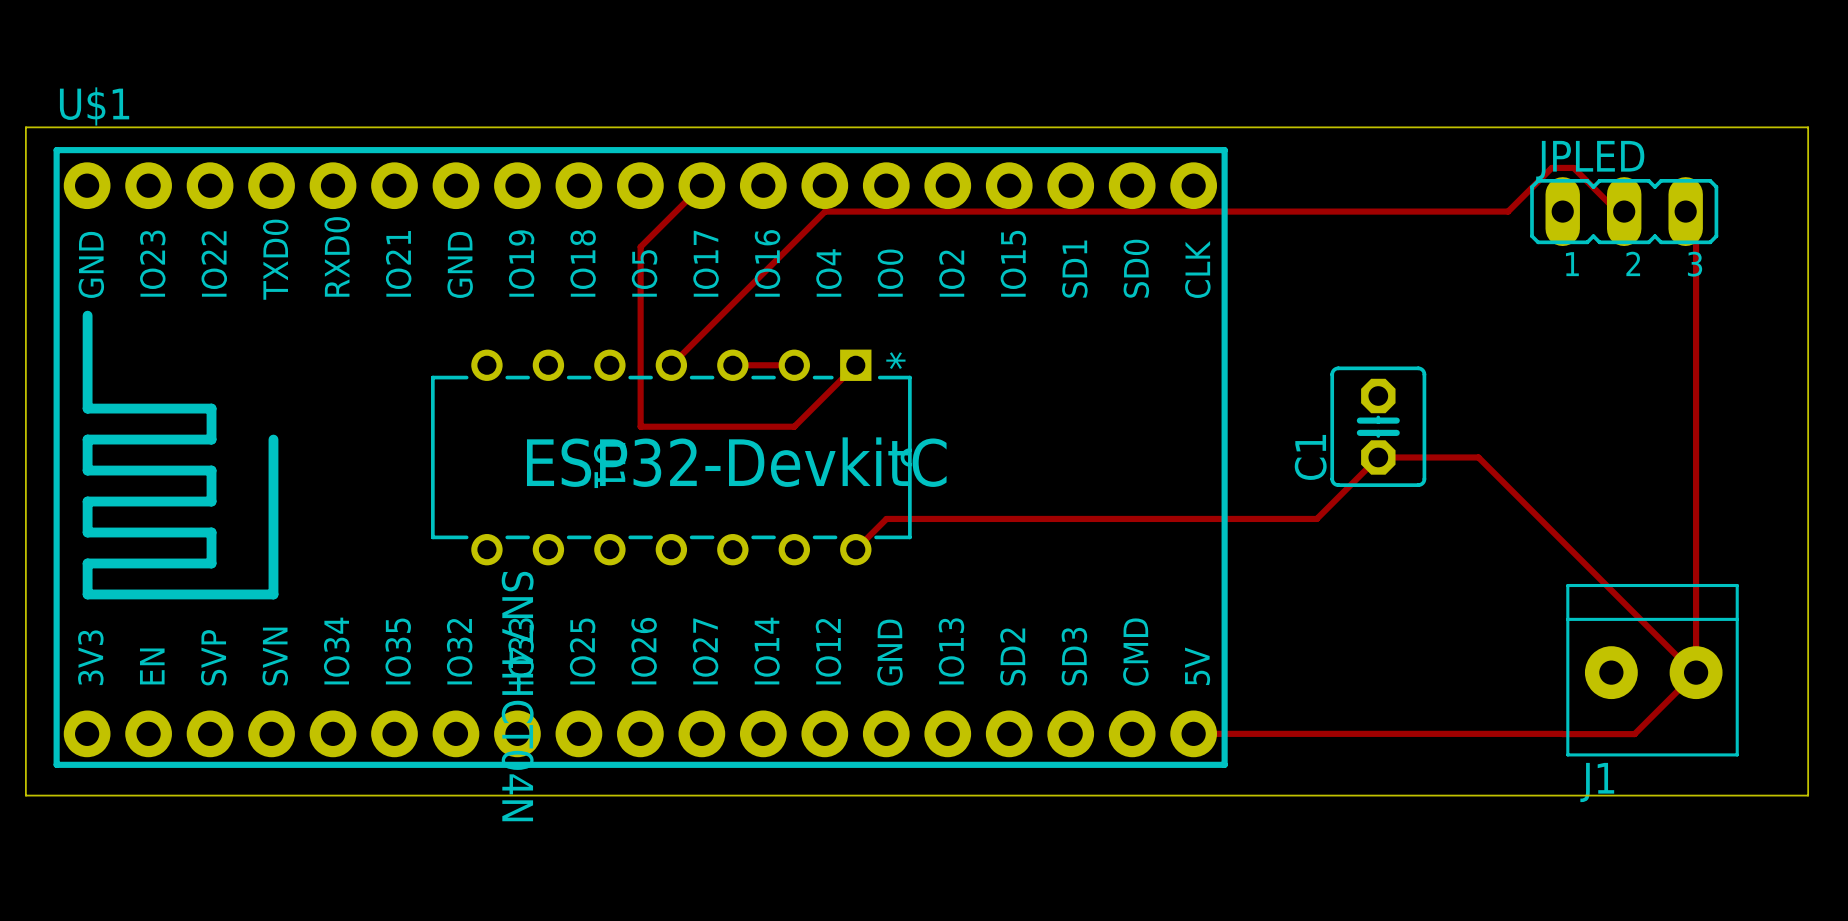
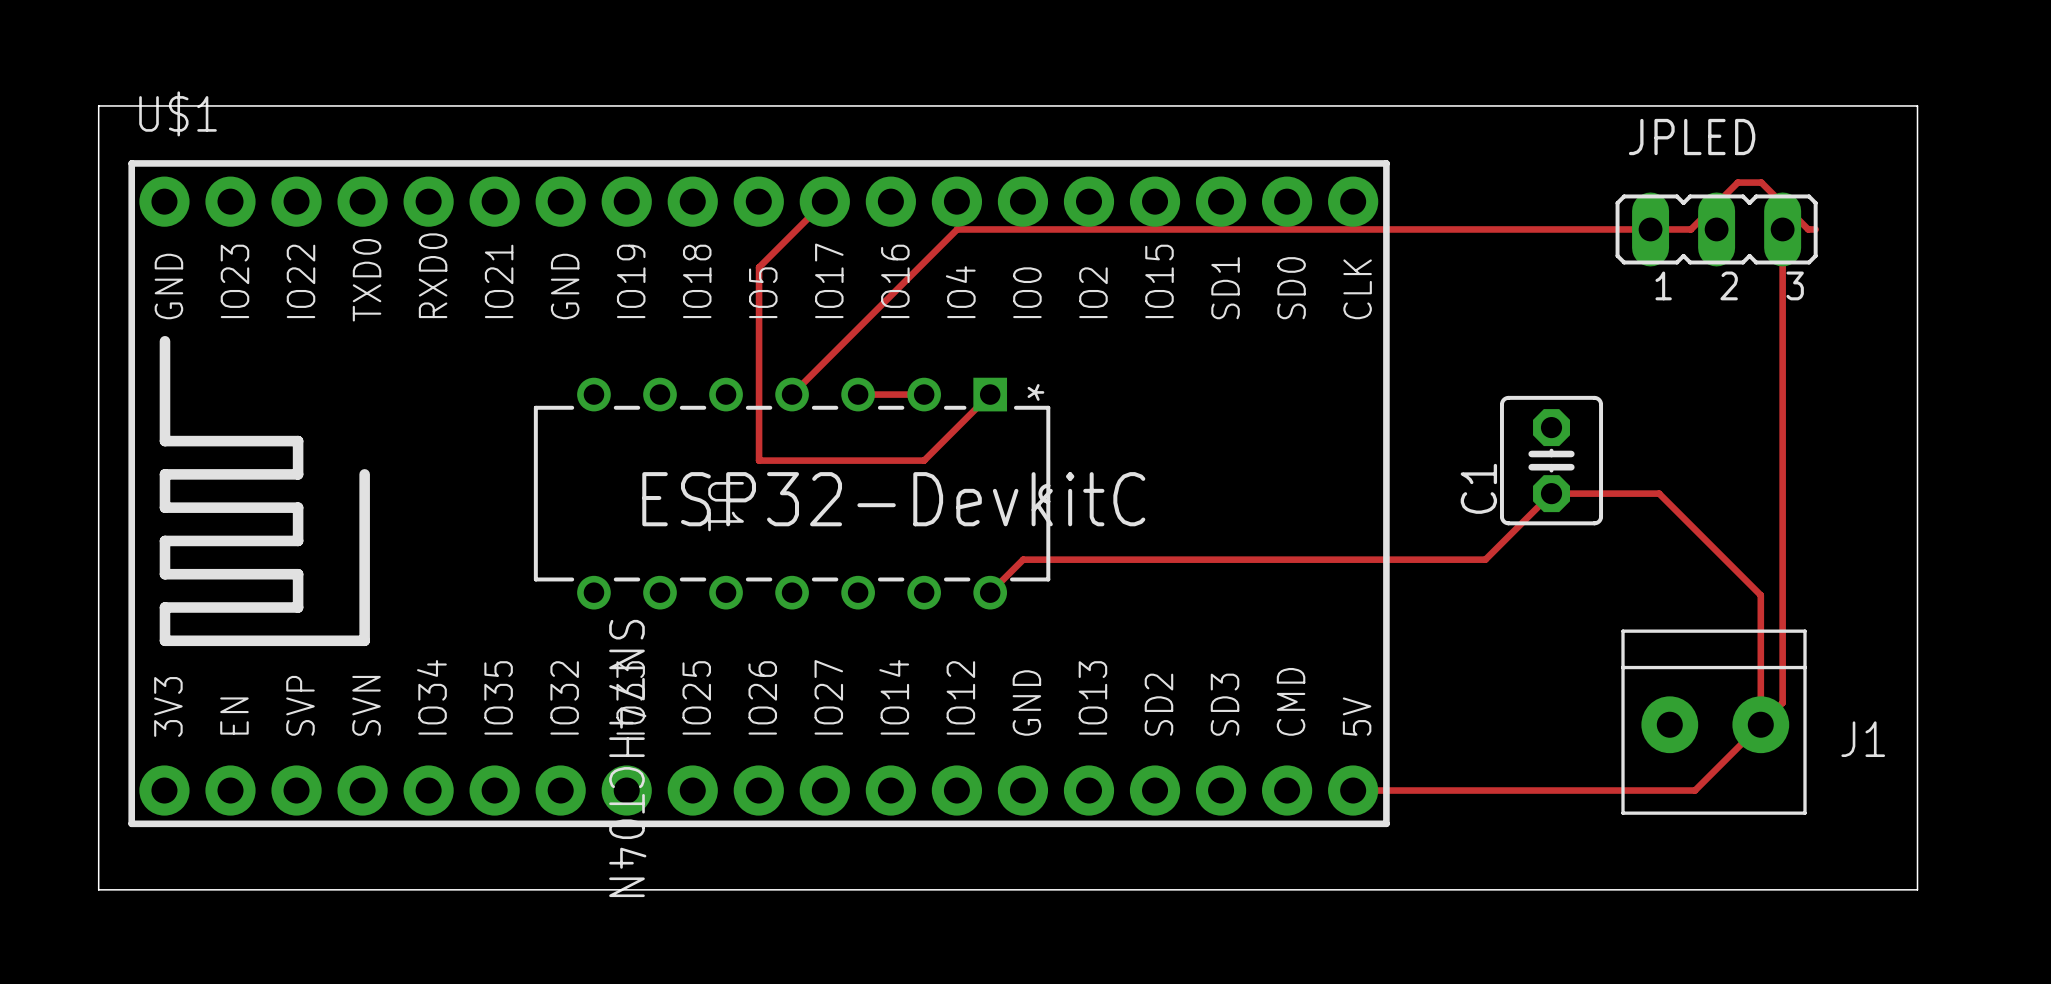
board edge: (25, 127) (1808, 127) (1808, 795) (25, 795) -> (98, 138) (98, 105) (1917, 105) (1917, 889) (98, 889) (98, 856)
JPLED name position: JPLED (1590, 160) -> JPLED (1692, 137)
track: (1685, 210) (1696, 221) (1696, 672) -> none
JPLED position: (1624, 211) -> (1716, 229)
track: (1573, 552) (1694, 673) -> (1760, 595) (1760, 724) (1759, 722)
J1 position: (1652, 670) -> (1714, 722)
track: (1694, 673) (1634, 734) (1562, 734) -> none
track: (1511, 733) (1562, 733) -> (1695, 790) (1782, 702) (1782, 229)
J1 name position: J1 (1597, 782) -> J1 (1863, 739)

